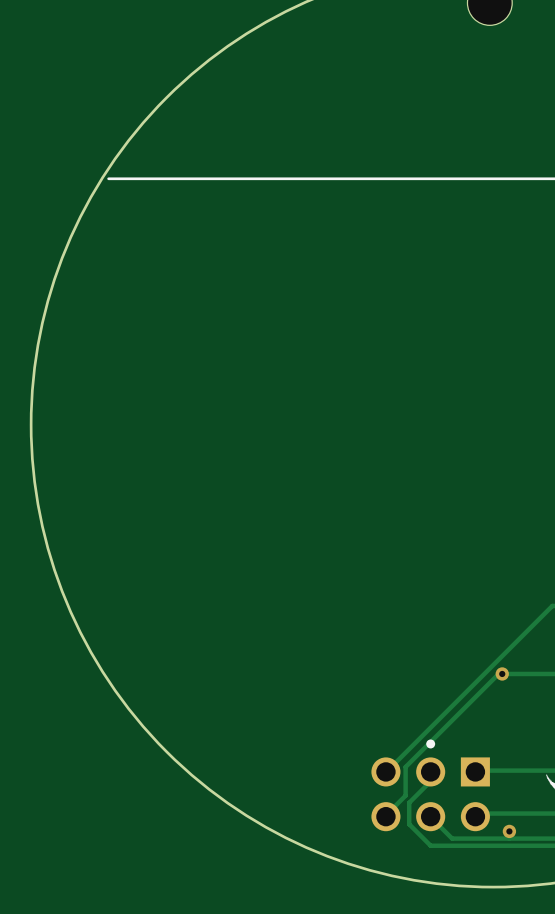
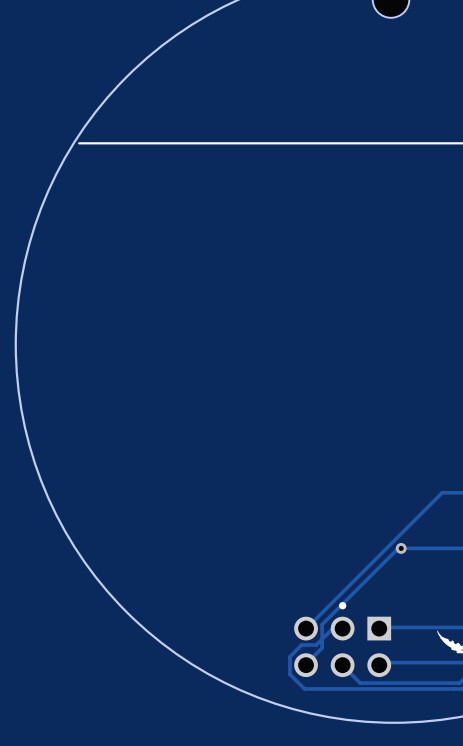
track: (430, 774) (430, 781) (409, 802) (409, 824) (430, 845) -> (342, 630) (330, 630) (316, 645) (301, 645) (289, 656) (289, 674) (304, 688) (342, 688)
via: (509, 831) -> none

